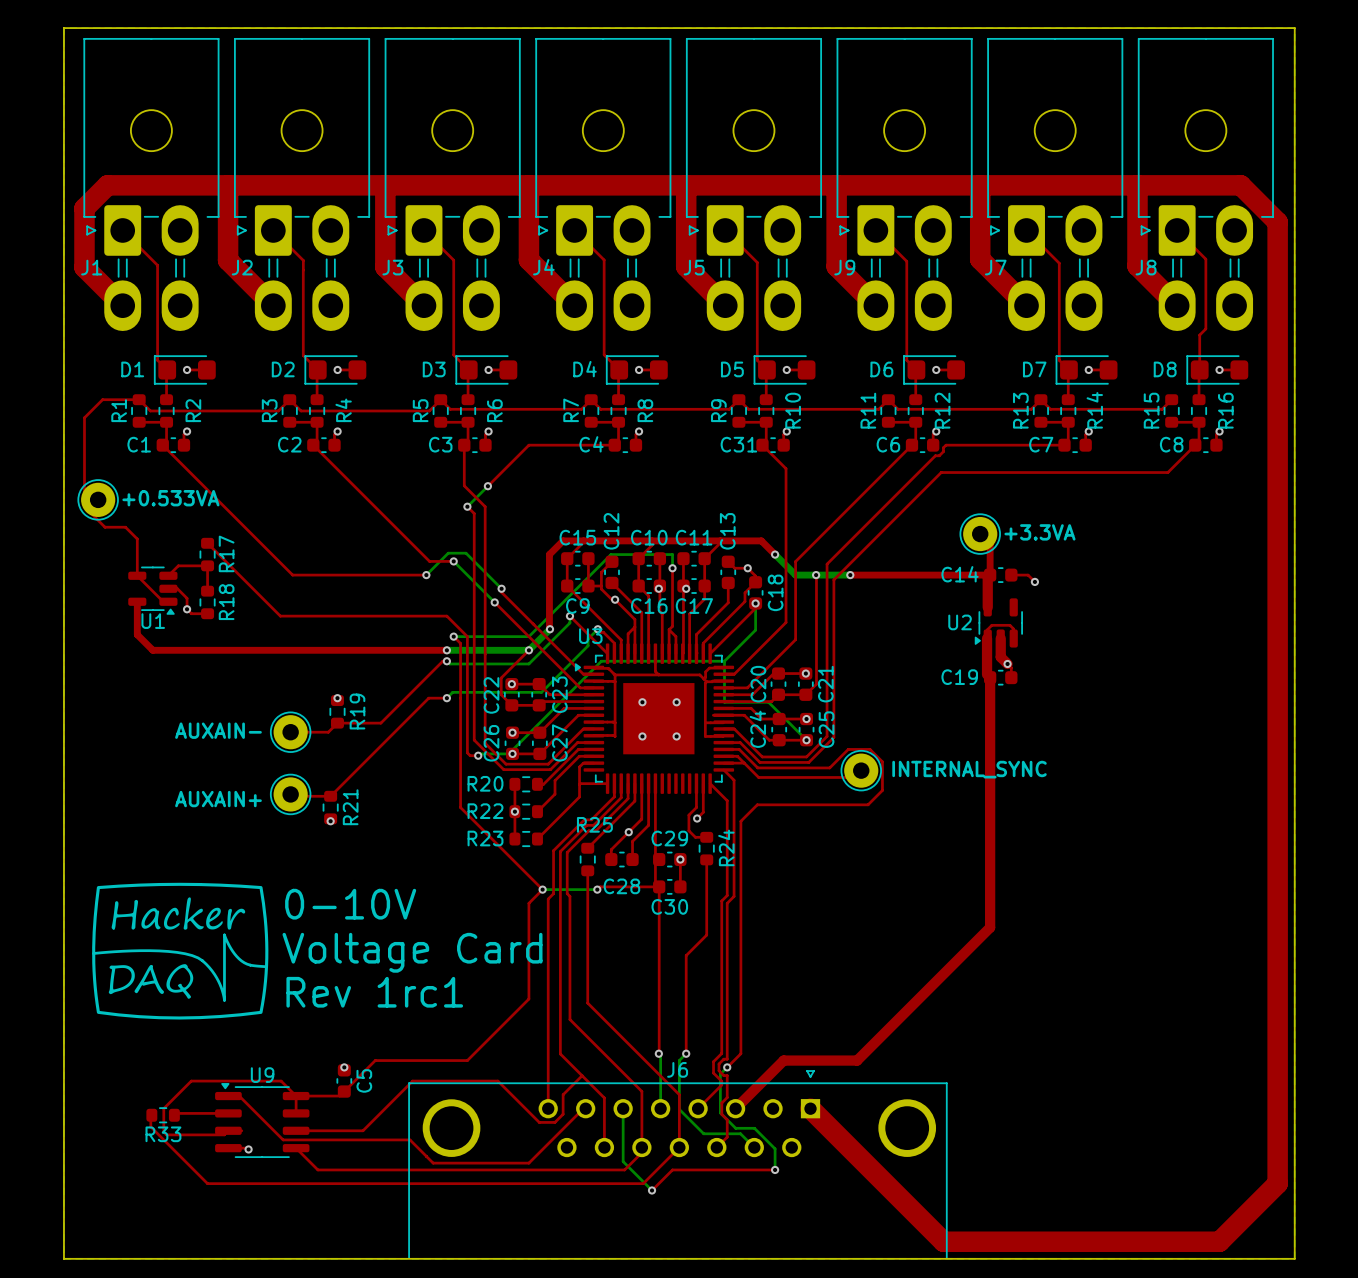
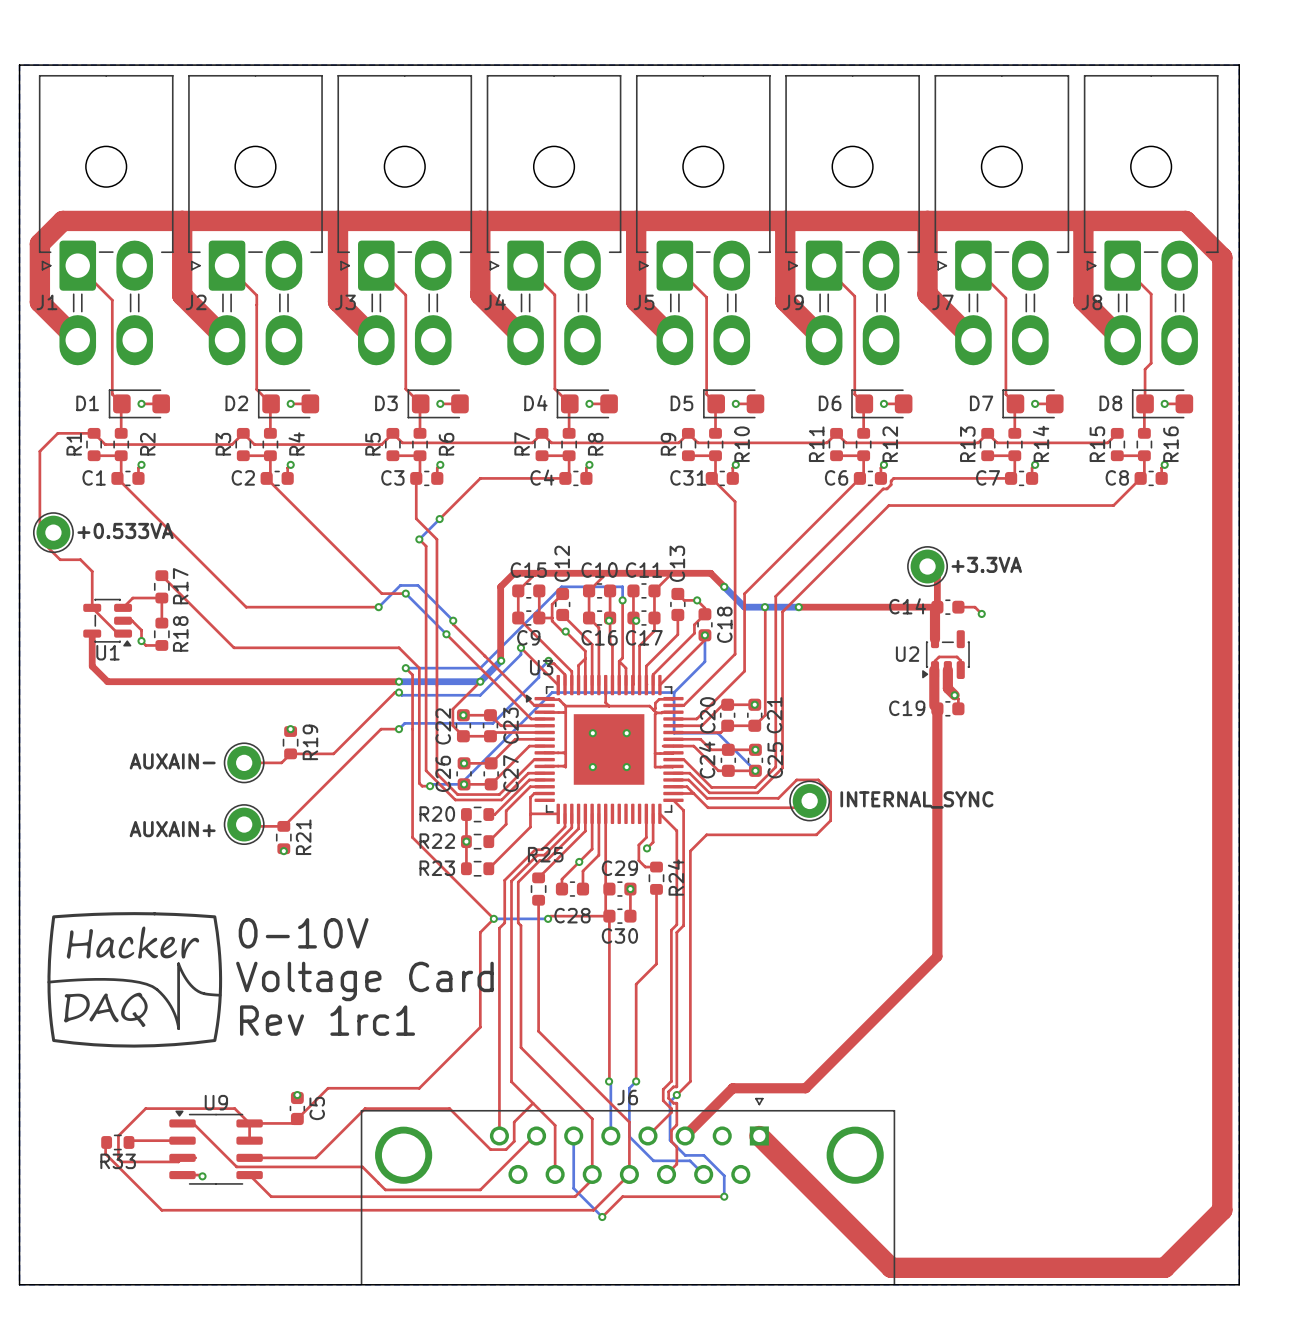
U1 footprint: [128, 566, 178, 615] -> [83, 598, 133, 647]
U2 footprint: [974, 598, 1023, 648] -> [922, 630, 970, 679]

